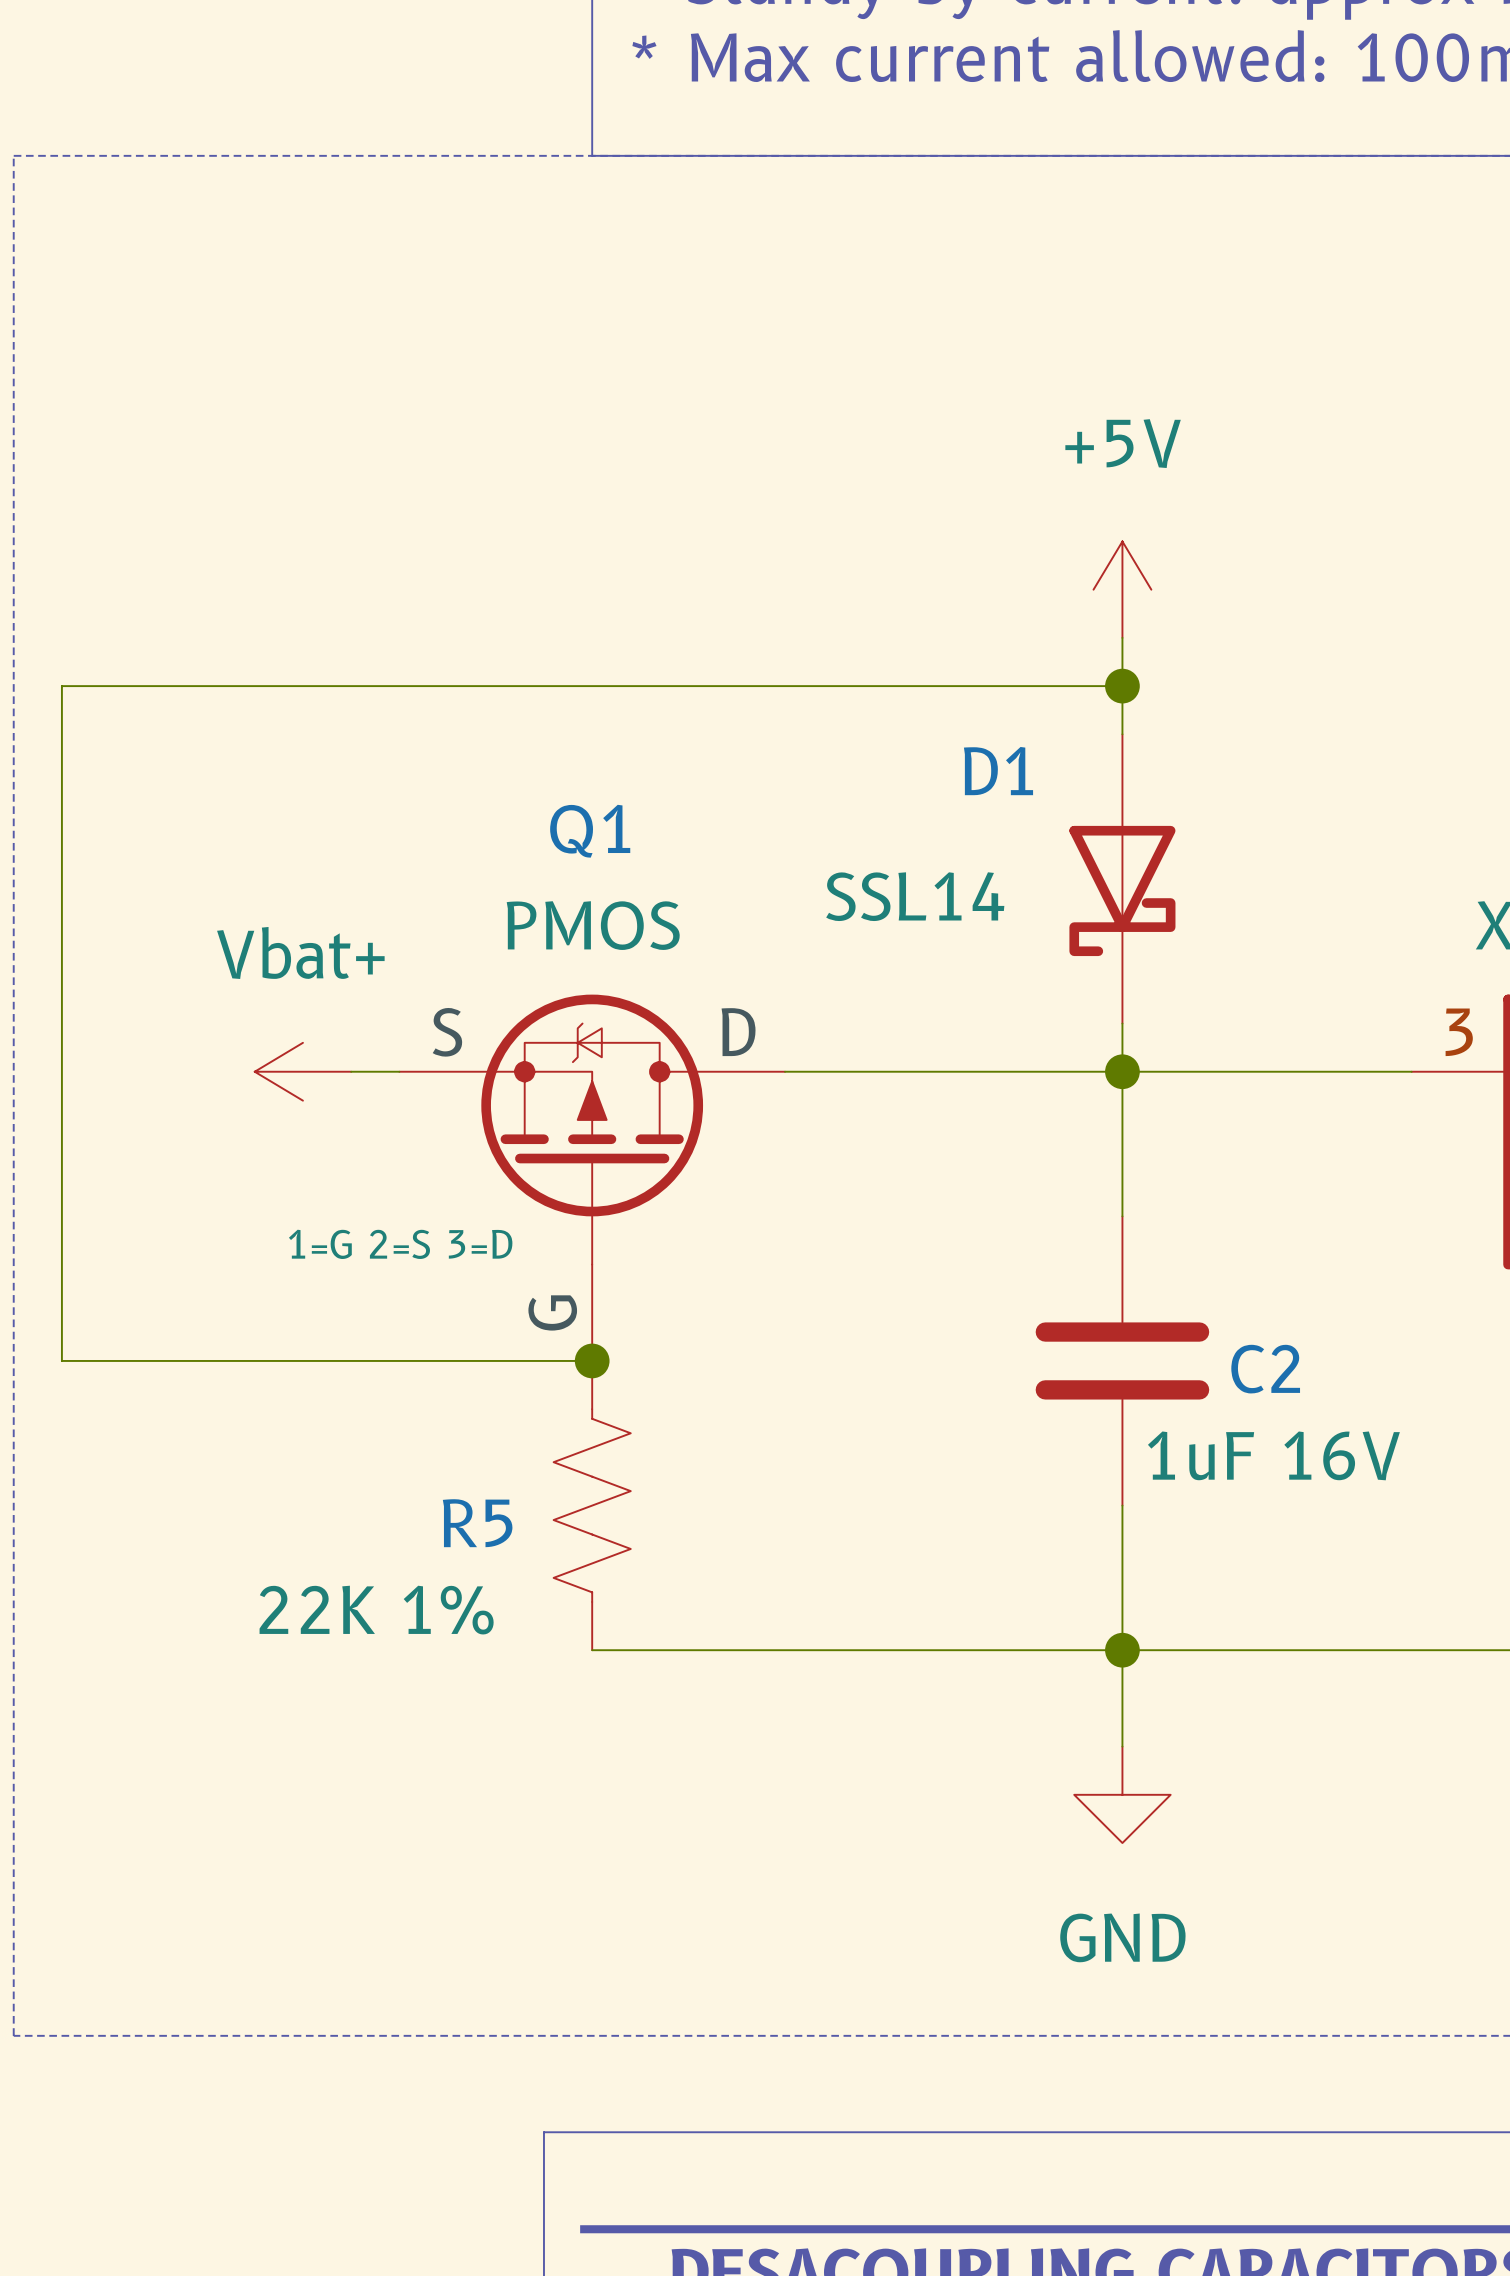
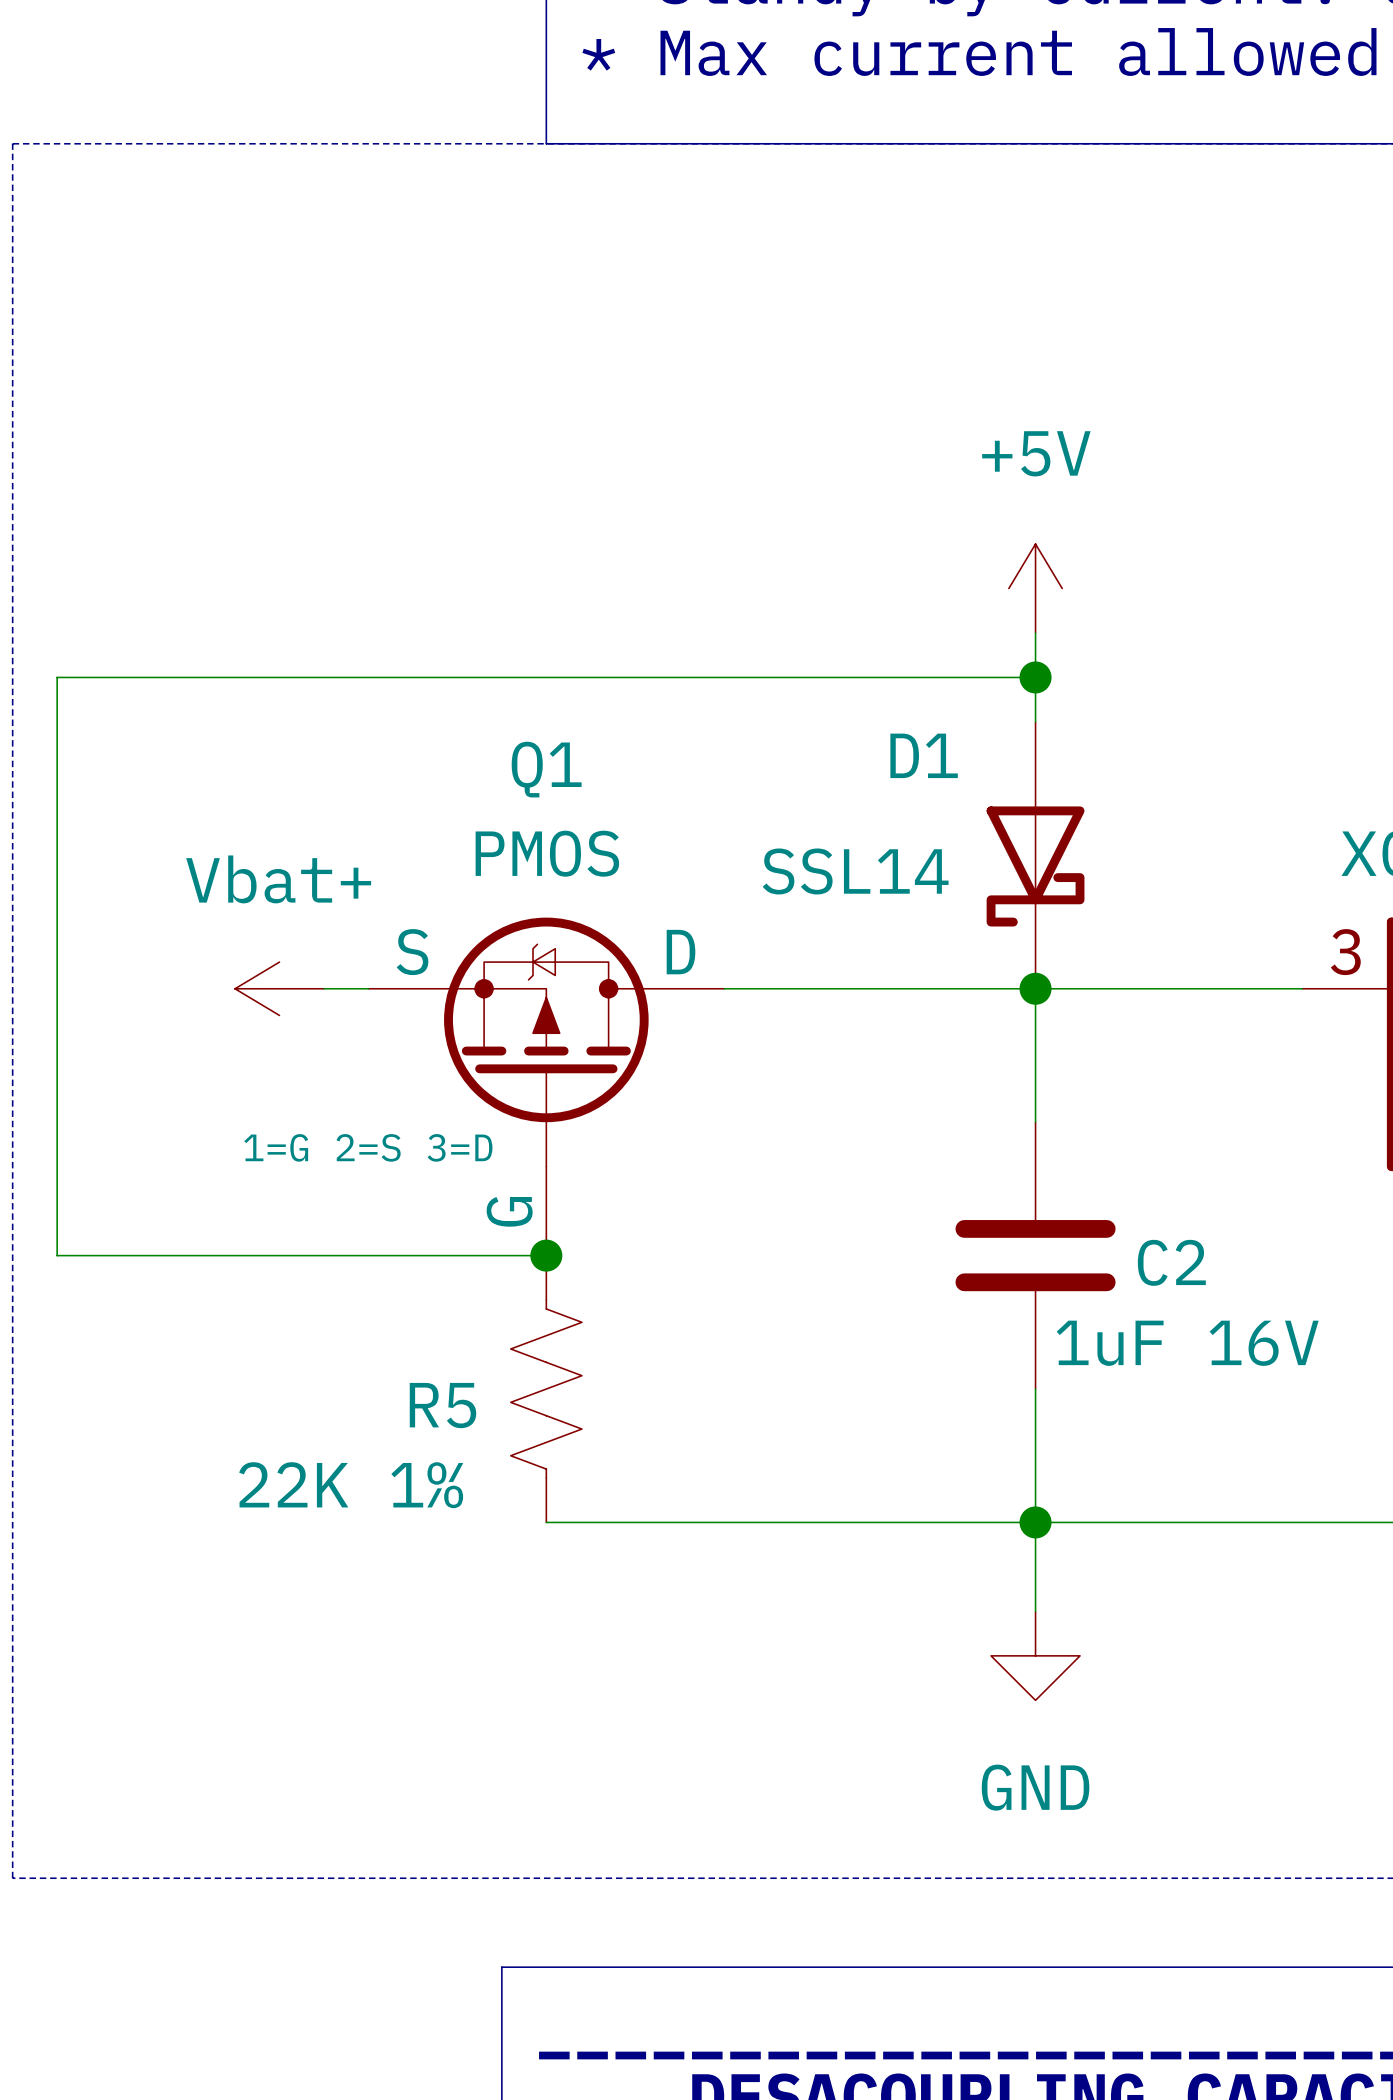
power symbol position: +5V (1122, 589) -> +5V (1035, 588)
wire: (1122, 637) (1122, 686) (61, 686) (61, 734) -> (1035, 721) (1035, 677) (57, 677)
junction position: (1122, 686) -> (1035, 677)
D1 position: (1122, 878) -> (1035, 855)

